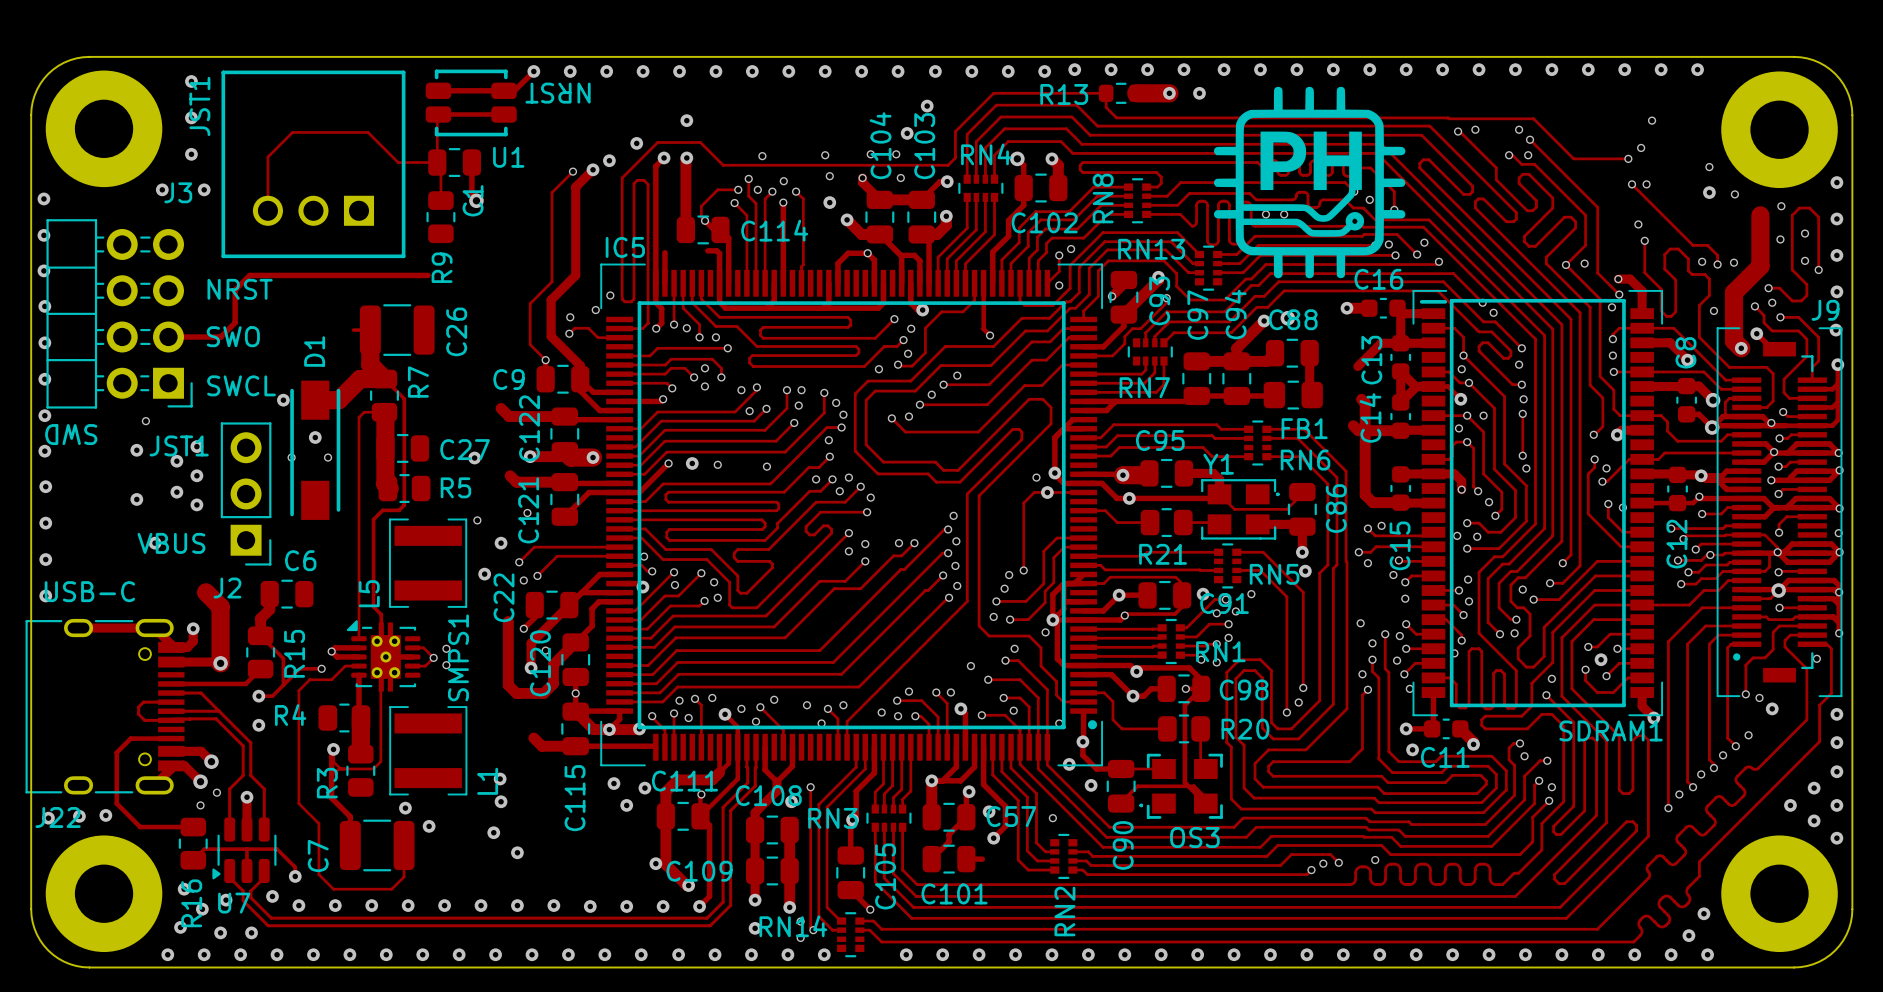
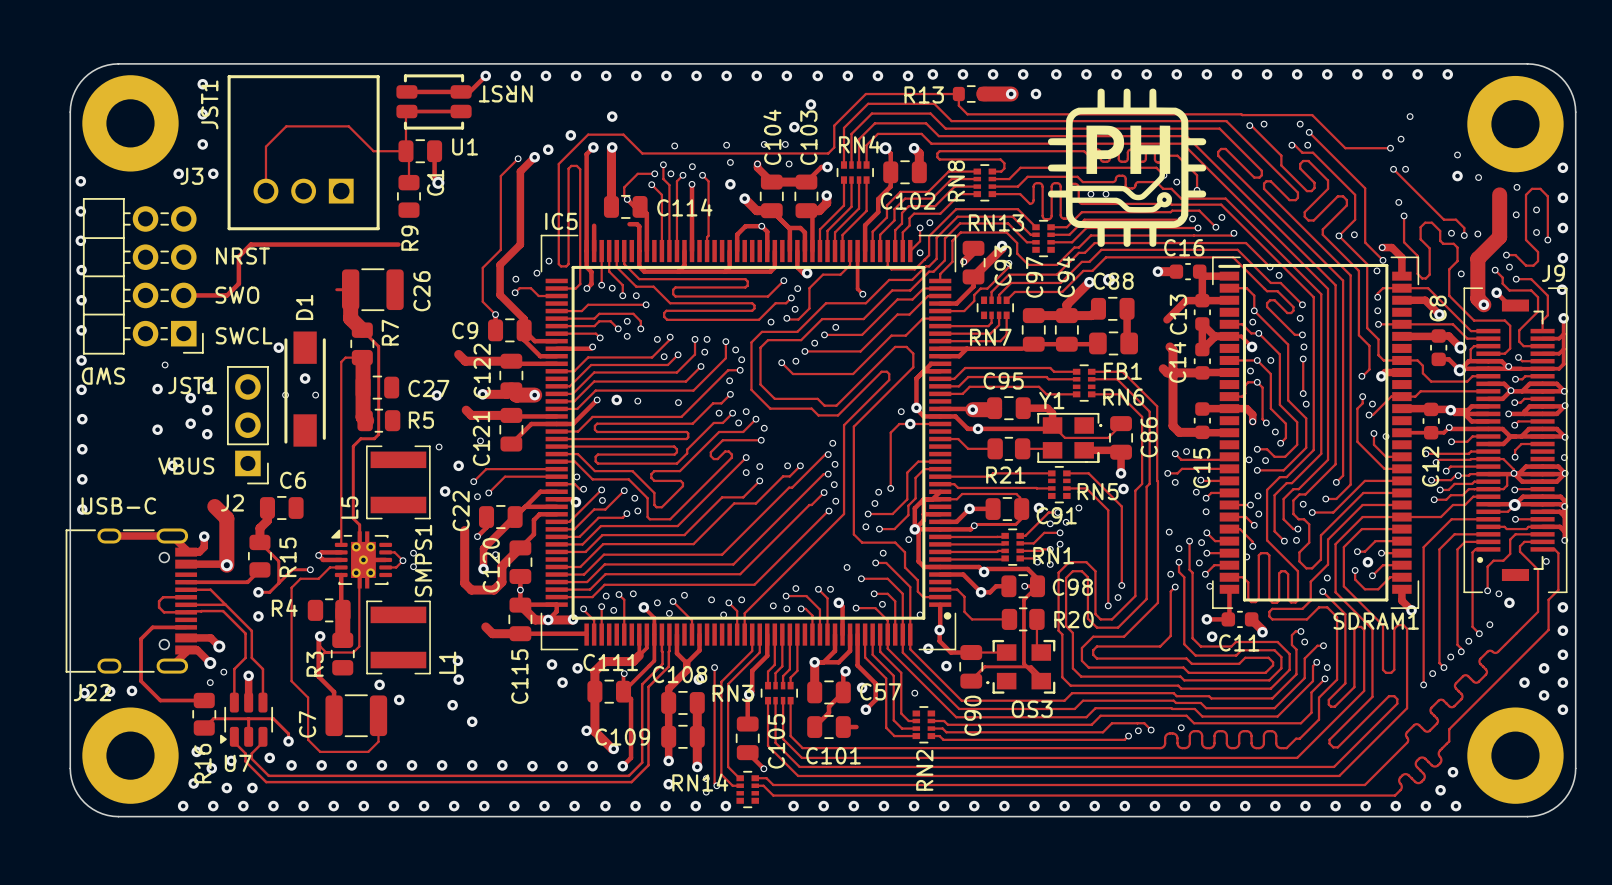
track: (384, 379) (360, 379) (338, 400) (315, 400) -> none

